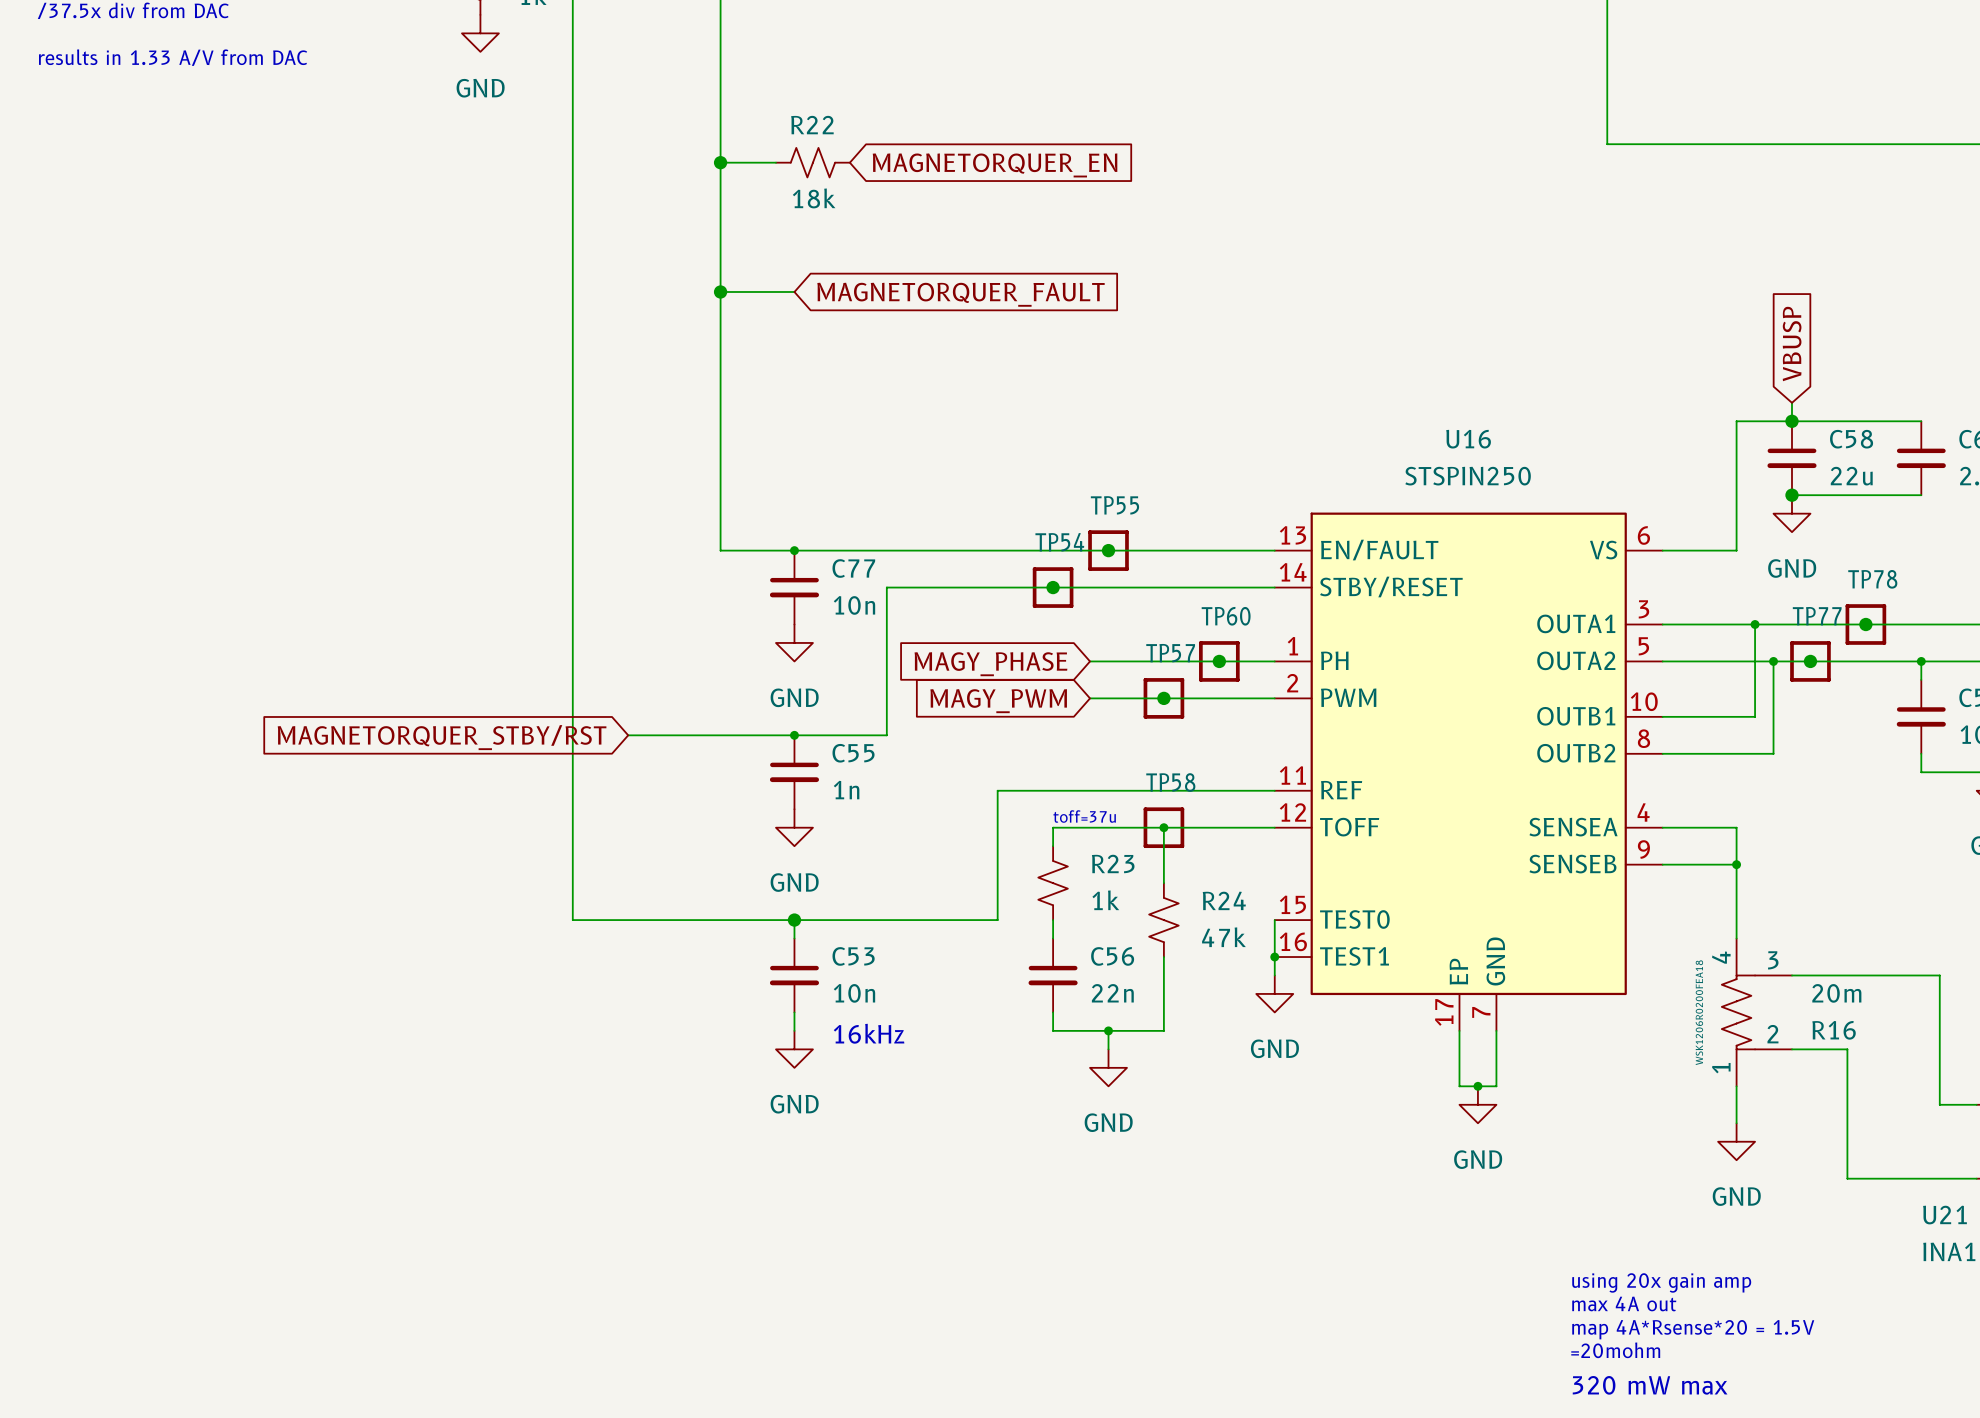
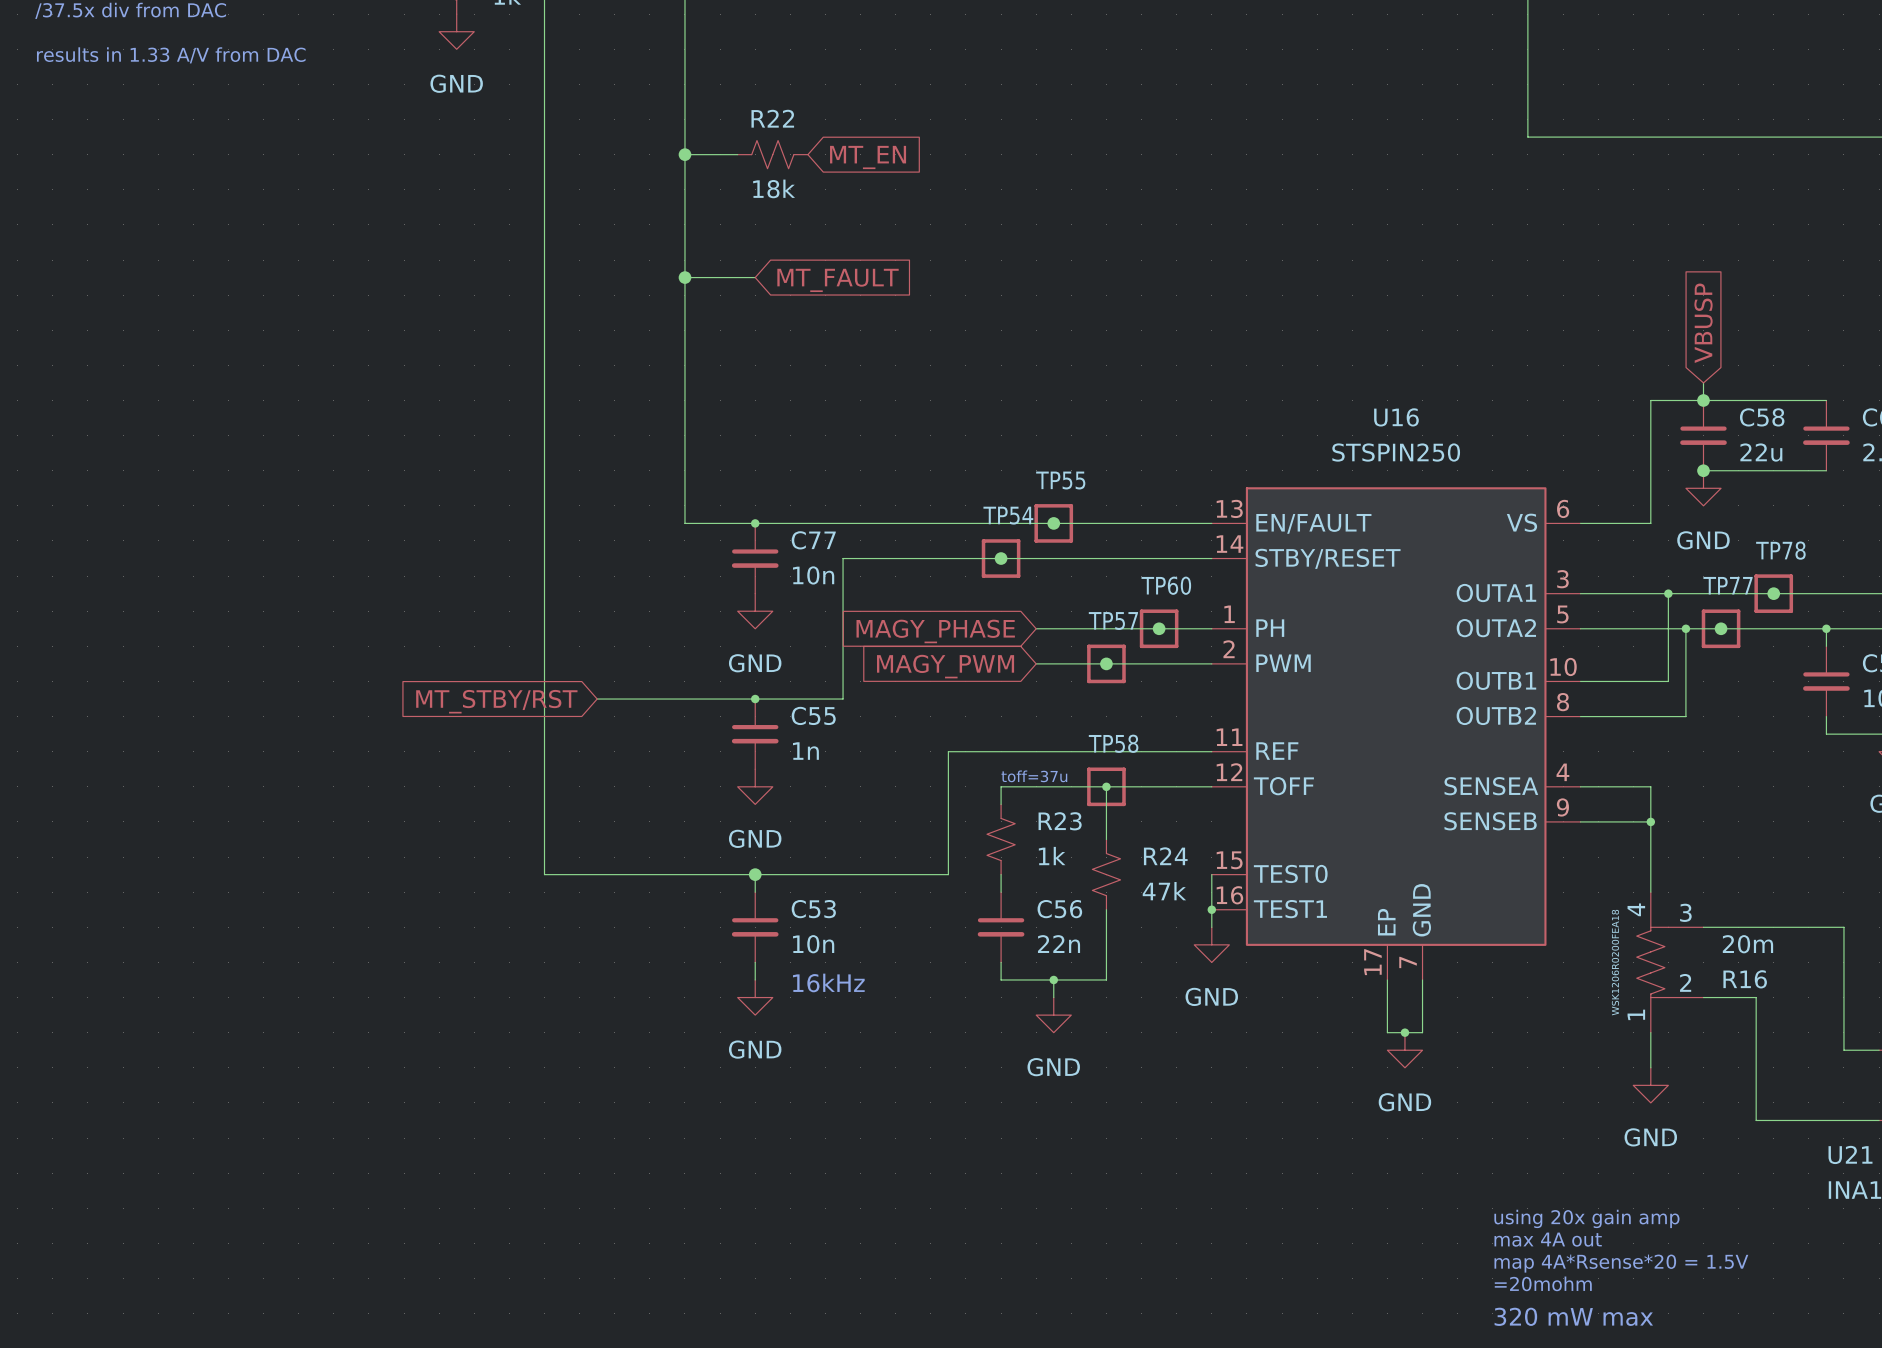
global label: MAGNETORQUER_EN (995, 165) -> MT_EN (868, 157)
global label: MAGNETORQUER_FAULT (961, 294) -> MT_FAULT (838, 280)
global label: MAGNETORQUER_STBY/RST (442, 737) -> MT_STBY/RST (496, 701)

